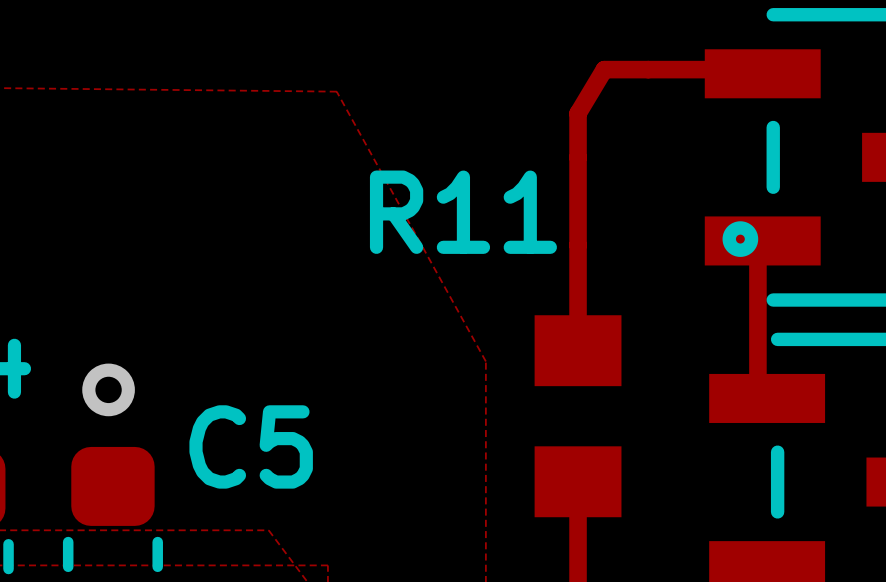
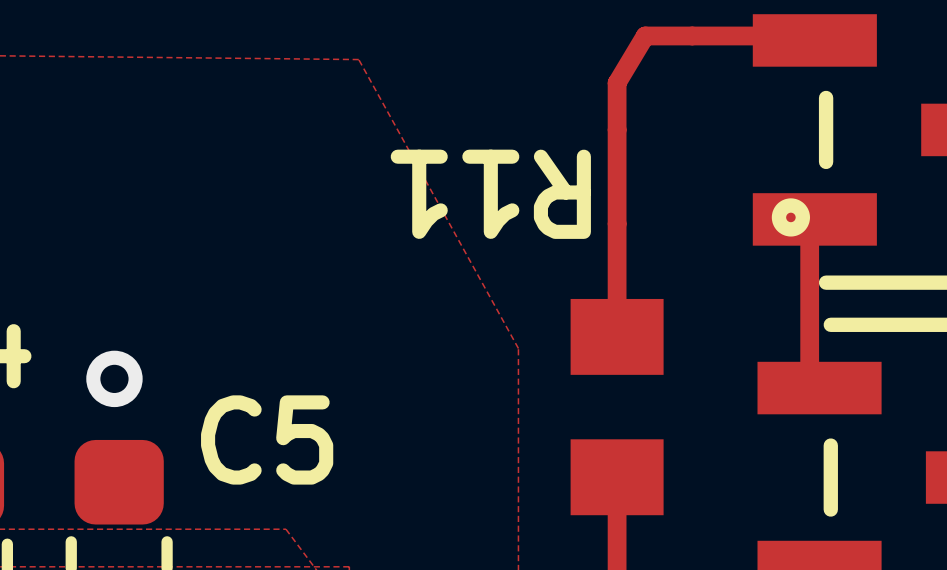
R11 name rotation: 0° (463, 212) -> 180° (490, 194)

